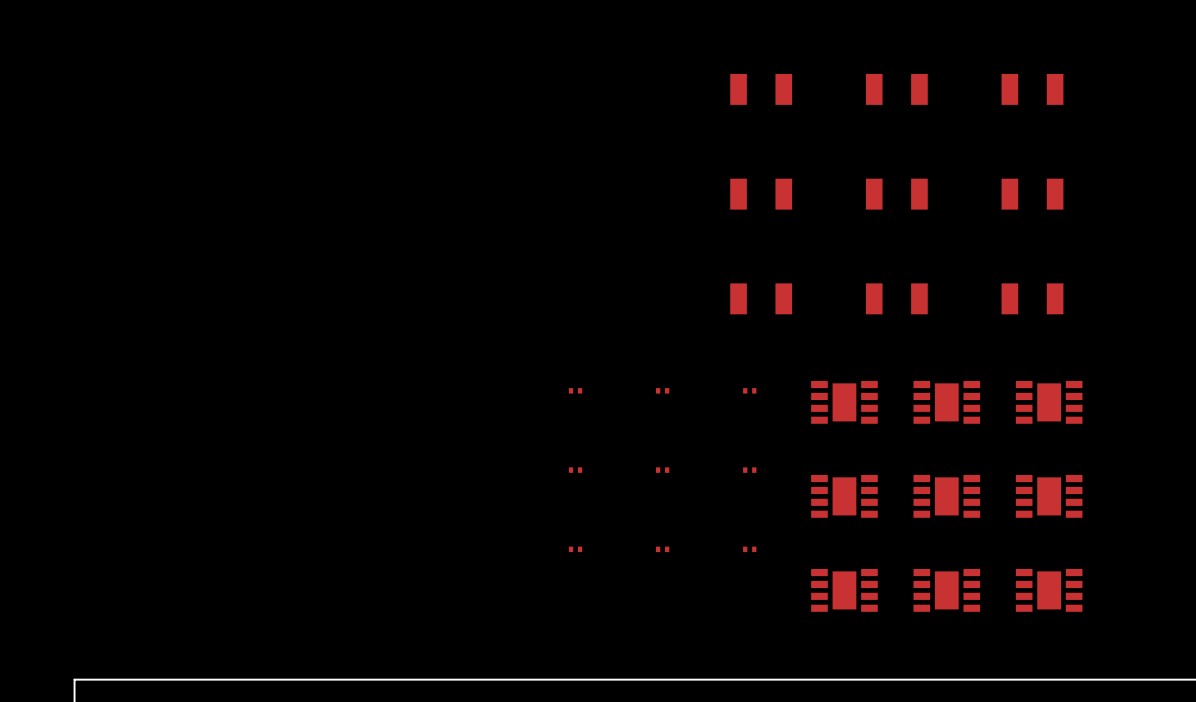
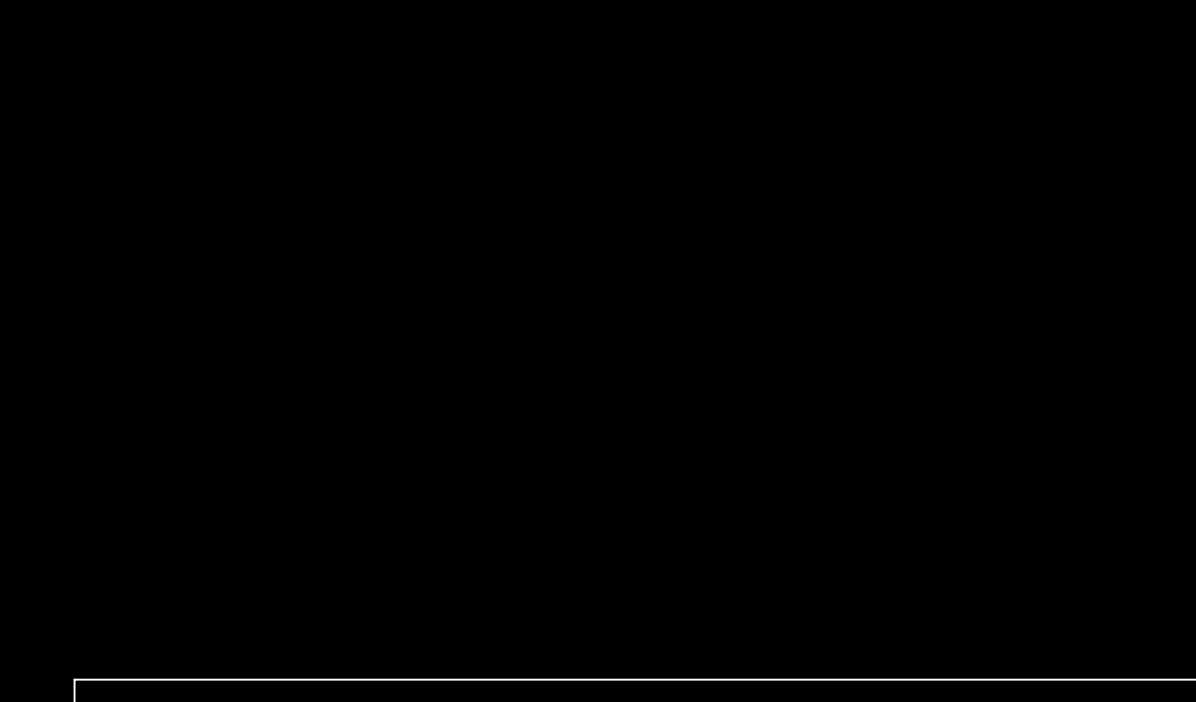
part: (761, 89) -> none
part: (896, 89) -> none
part: (1032, 89) -> none
part: (761, 194) -> none
part: (896, 194) -> none
part: (1032, 194) -> none
part: (761, 298) -> none
part: (896, 298) -> none
part: (1032, 298) -> none
part: (575, 390) -> none
part: (662, 390) -> none
part: (749, 390) -> none
part: (844, 402) -> none
part: (946, 402) -> none
part: (1049, 402) -> none
part: (575, 470) -> none
part: (662, 470) -> none
part: (749, 470) -> none
part: (844, 496) -> none
part: (946, 496) -> none
part: (1049, 496) -> none
part: (575, 549) -> none
part: (662, 549) -> none
part: (749, 549) -> none
part: (844, 590) -> none
part: (946, 590) -> none
part: (1049, 590) -> none

